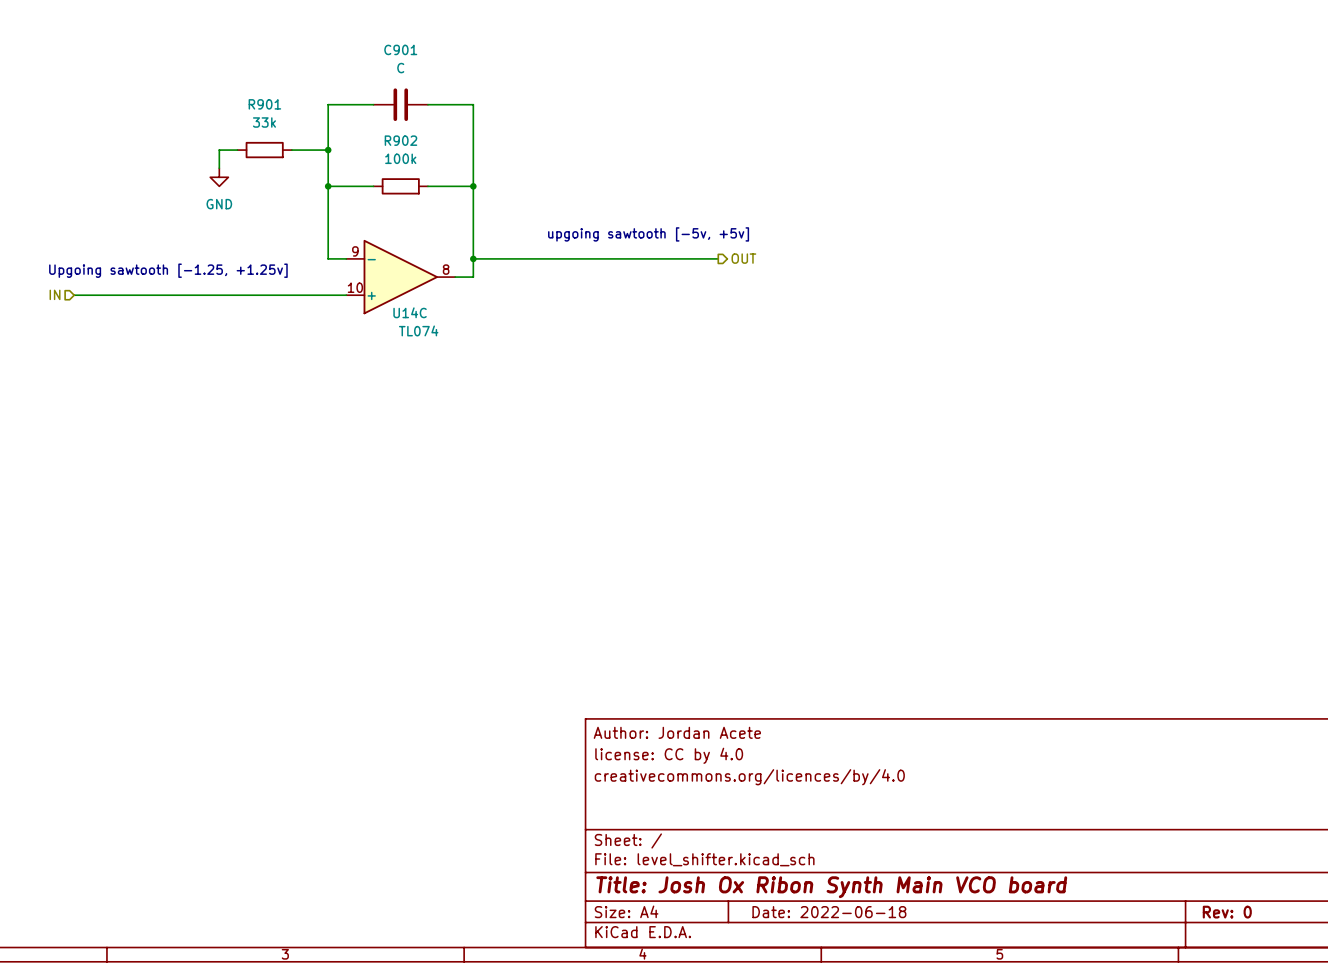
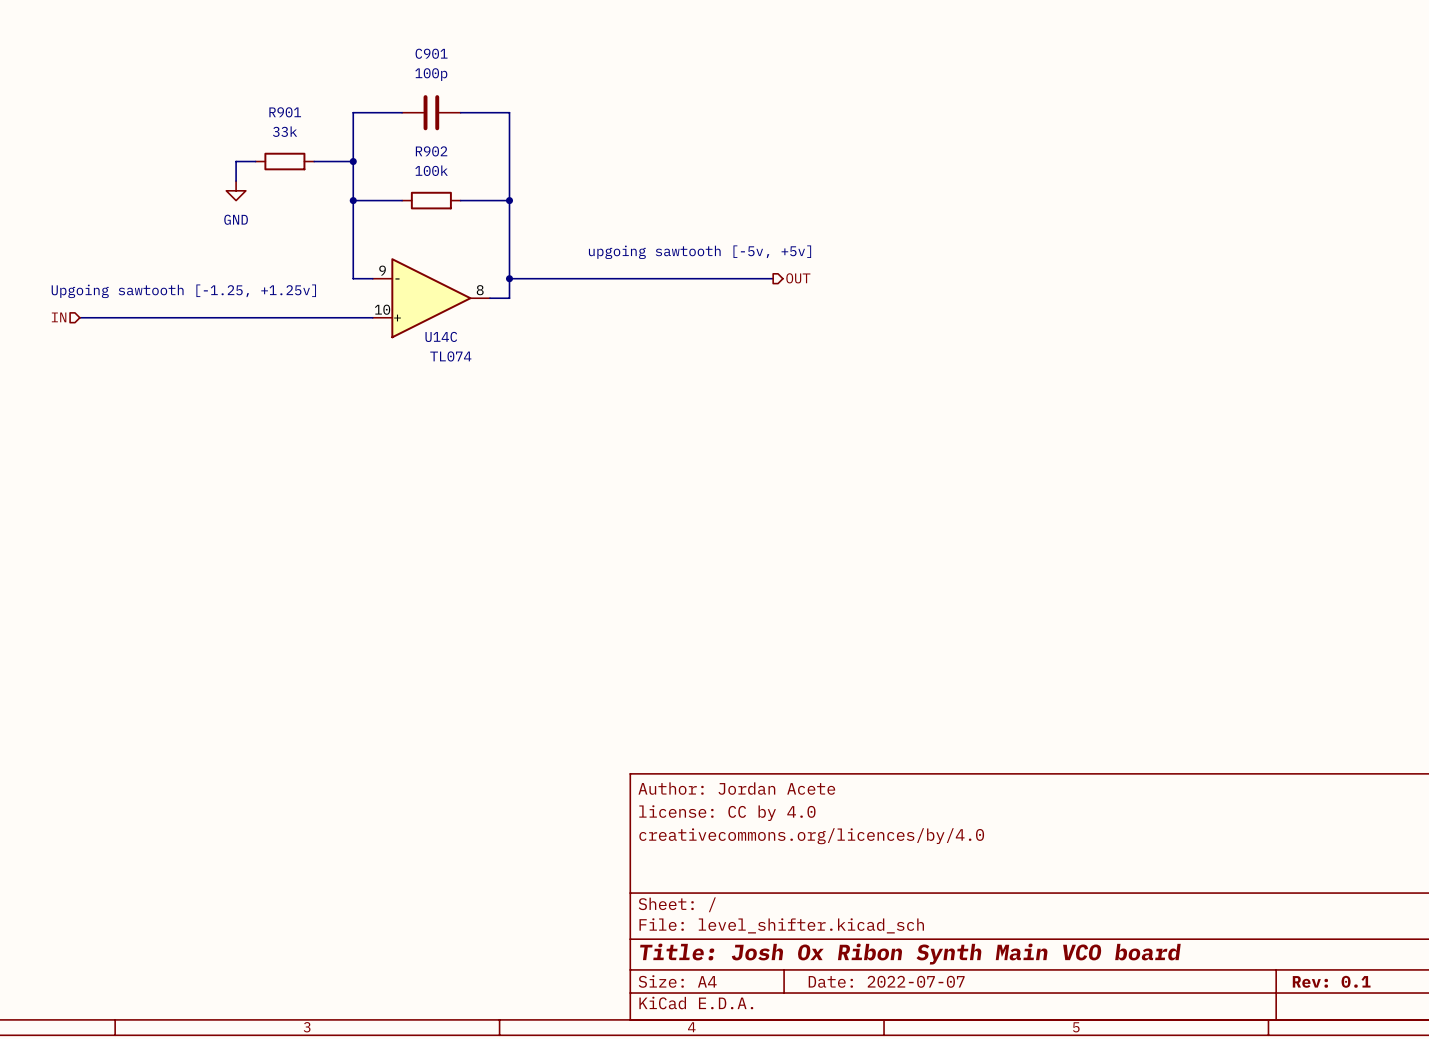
C901 value: C (400, 68) -> 100p (431, 74)
title block: Date: 2022-06-18 (829, 912) -> Date: 2022-07-07 (886, 981)
title block: Rev: 0 (1227, 912) -> Rev: 0.1 (1331, 981)

